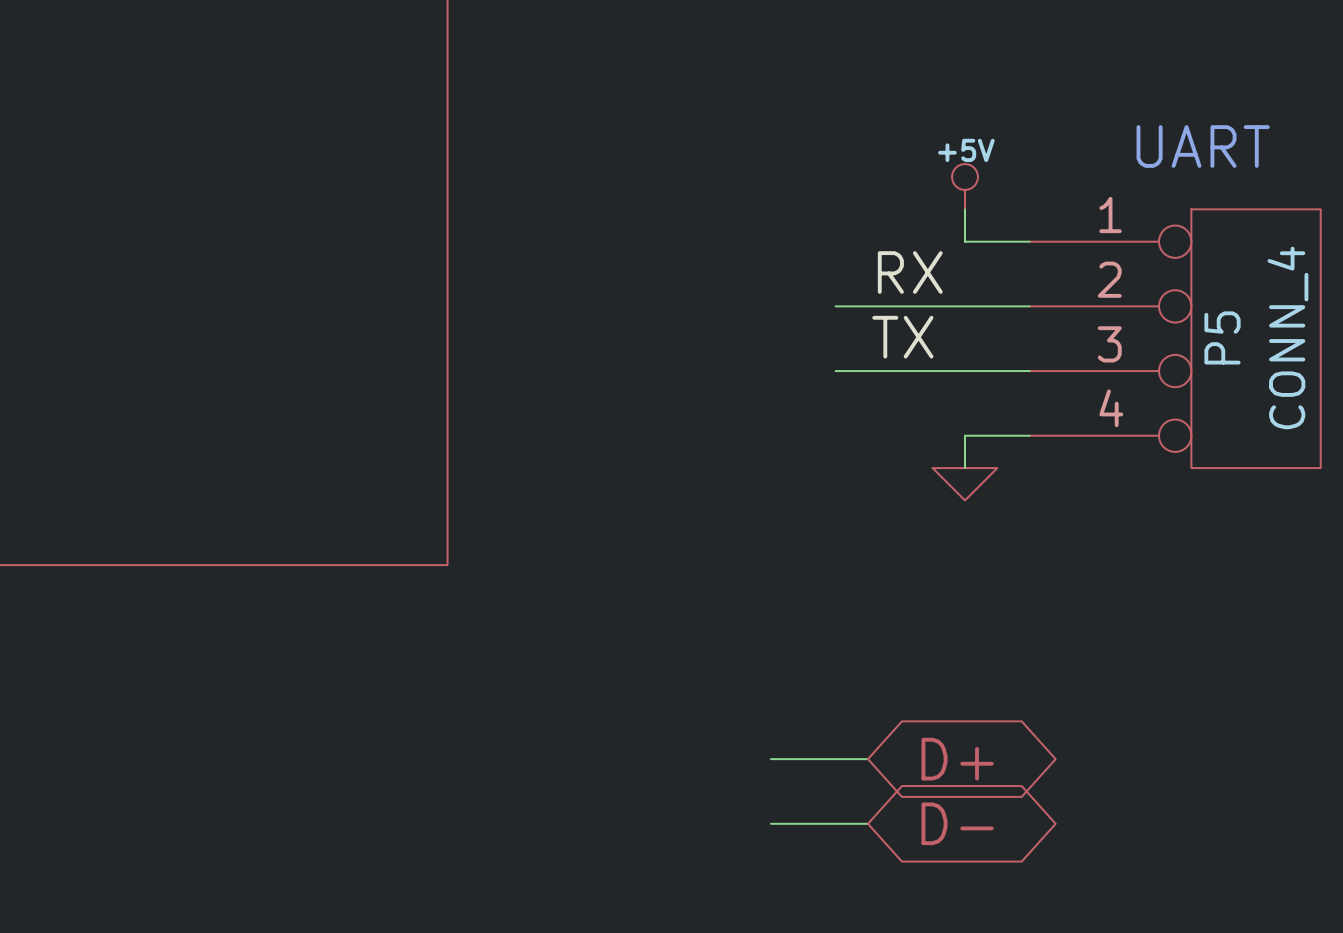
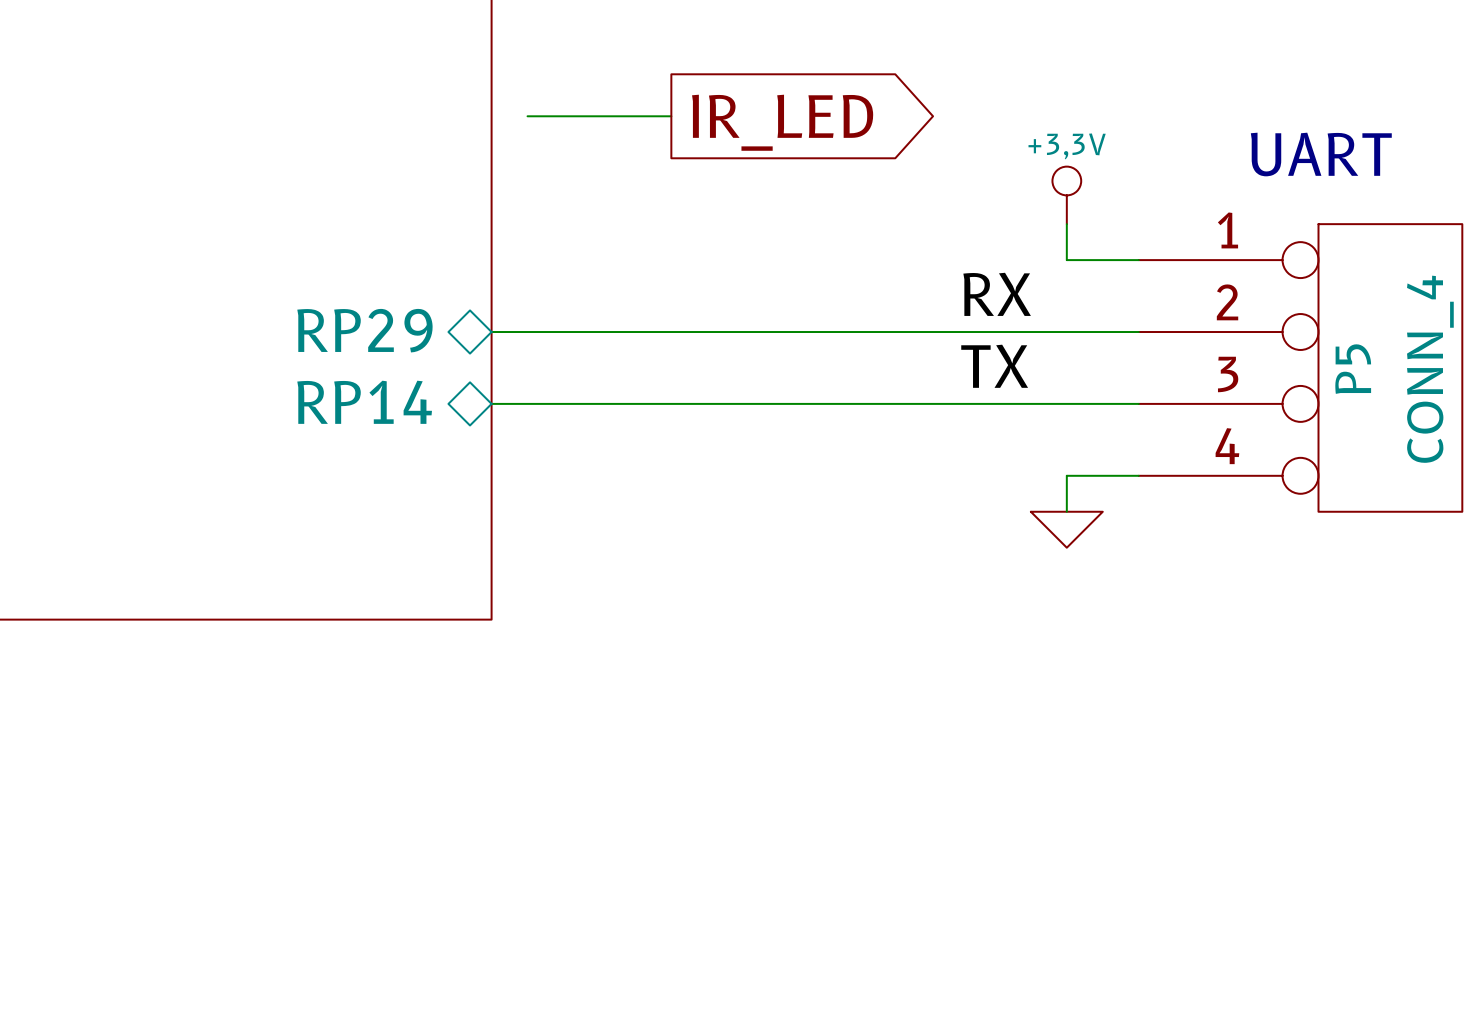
wire: none -> (527, 116) (671, 116)
global label: none -> IR_LED (782, 122)
power symbol: +5V (965, 186) -> +3,3V (1066, 195)
sheet pin: none -> RP29 (364, 330)
wire: none -> (491, 332) (923, 332)
sheet pin: none -> RP14 (364, 402)
wire: none -> (491, 403) (923, 403)
wire: (770, 759) (867, 759) -> none
global label: D+ (957, 759) -> none
wire: (770, 823) (867, 823) -> none
global label: D- (957, 823) -> none

